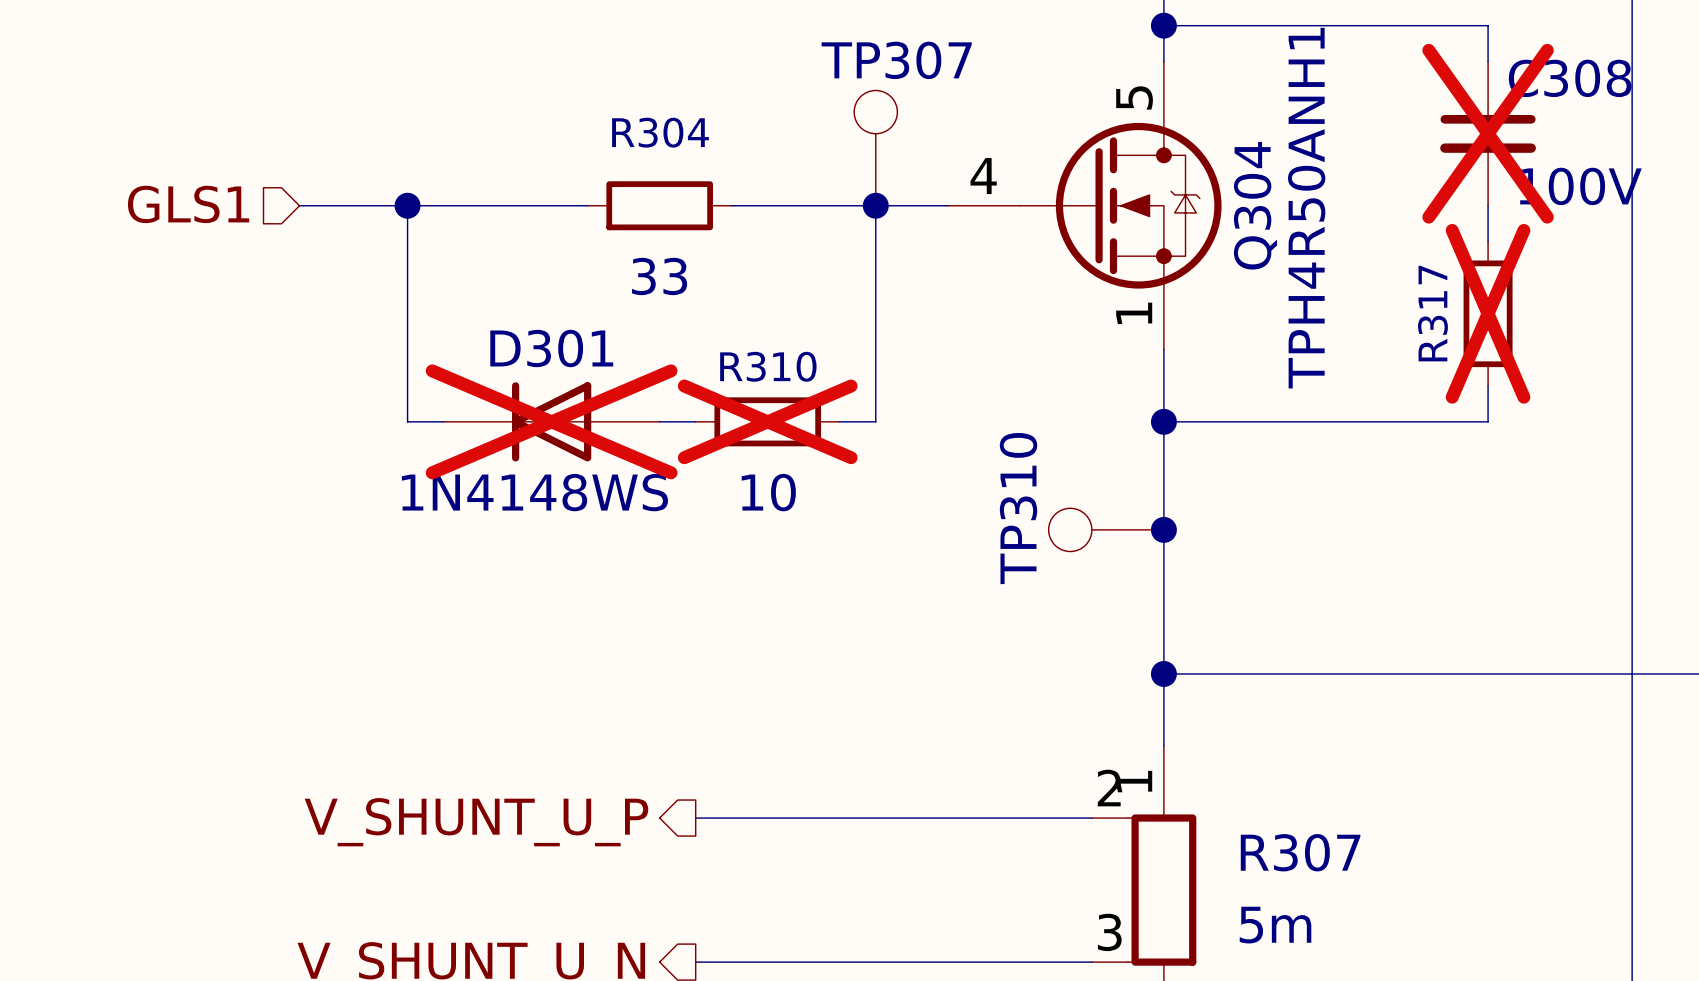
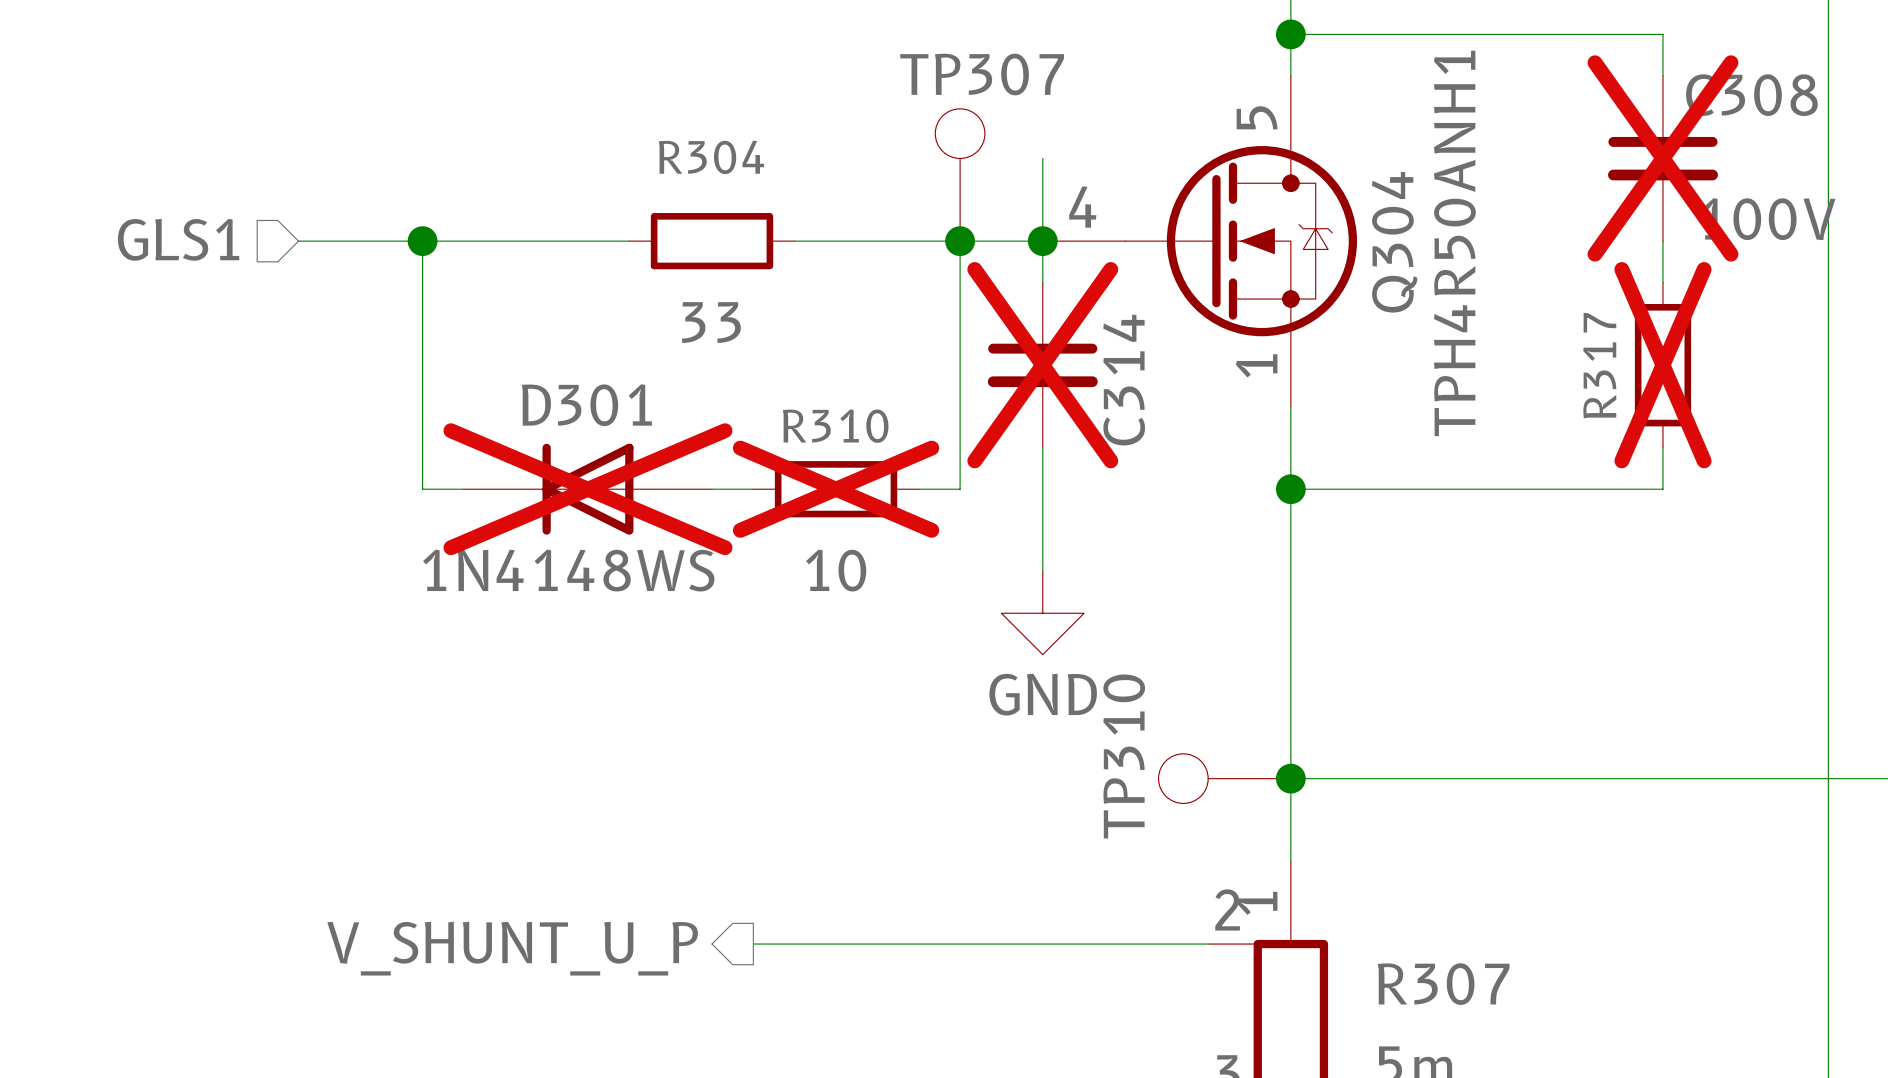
wire: none -> (1042, 158) (1042, 282)
junction: none -> (1042, 241)
C314: none -> (1042, 365)
wire: none -> (1042, 447) (1042, 571)
power symbol: none -> GND (1042, 613)
TP310 position: (1106, 529) -> (1224, 778)
junction: (1163, 529) -> none

